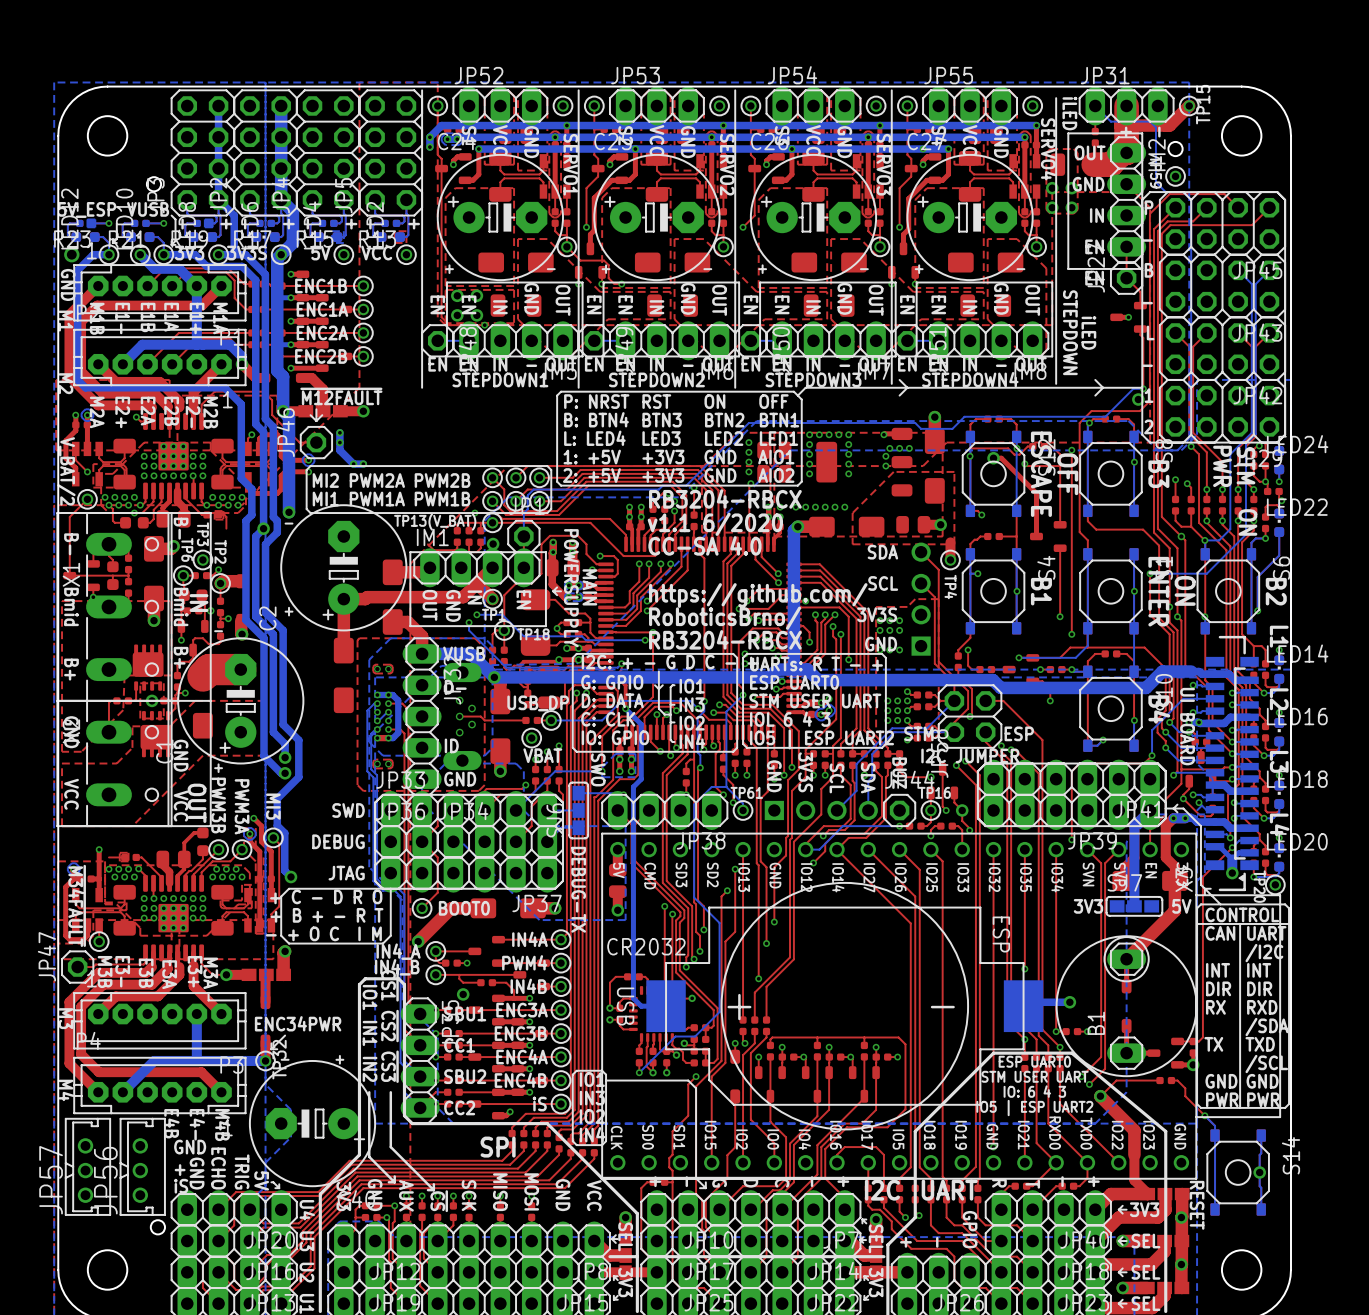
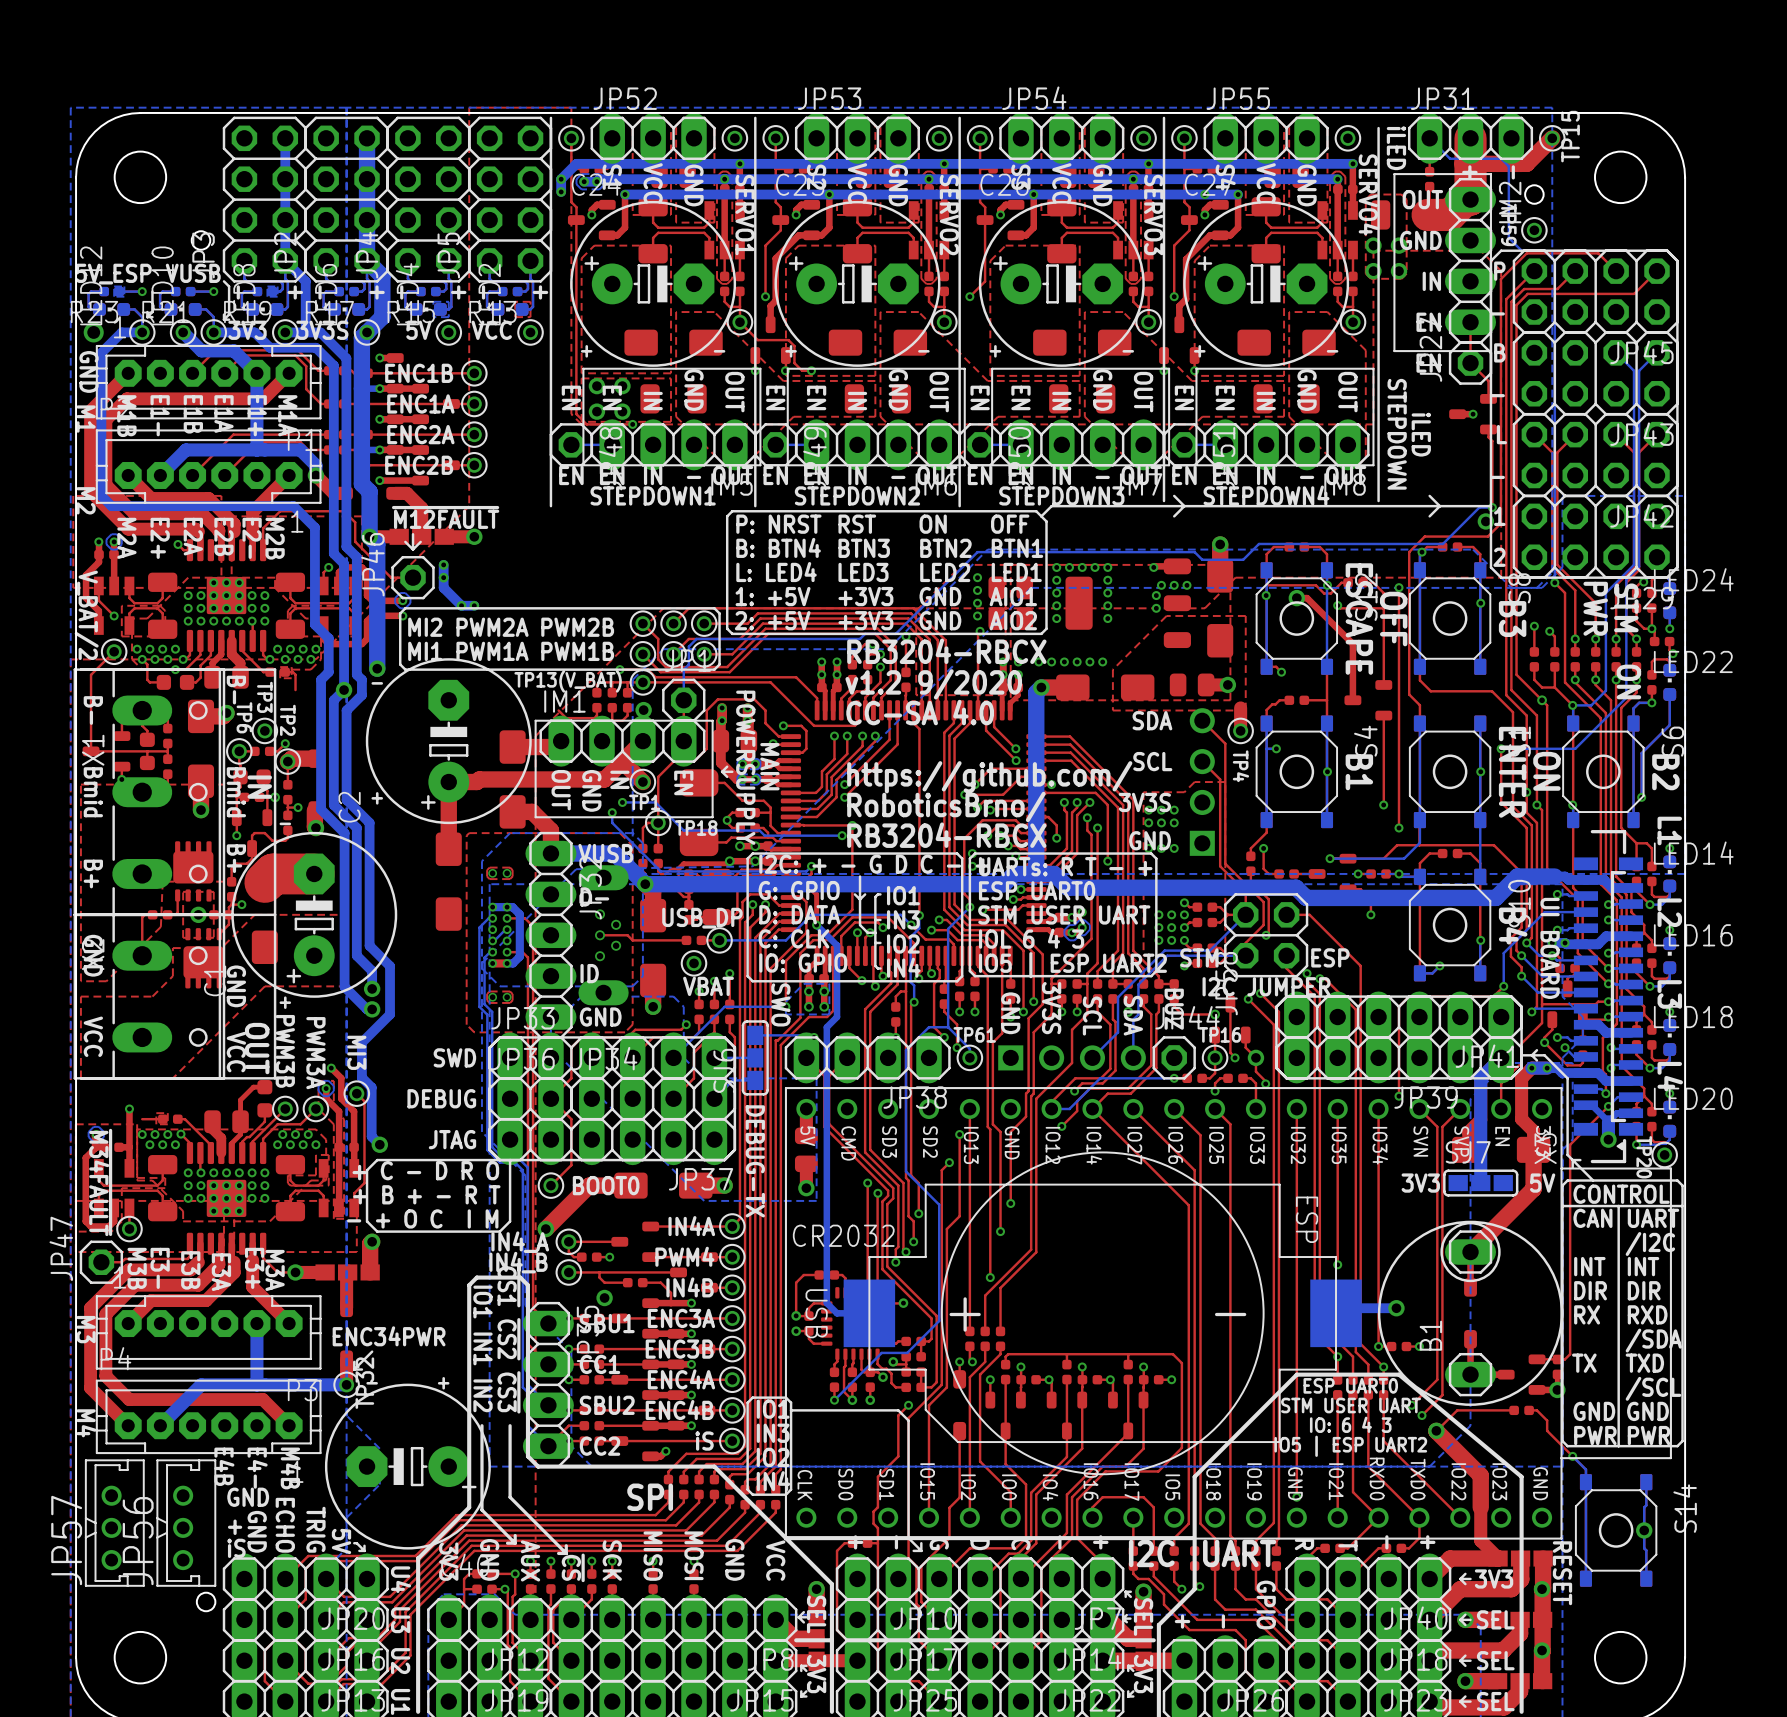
text: v1.1 6/2020 (715, 524) -> v1.2 9/2020 (933, 684)

